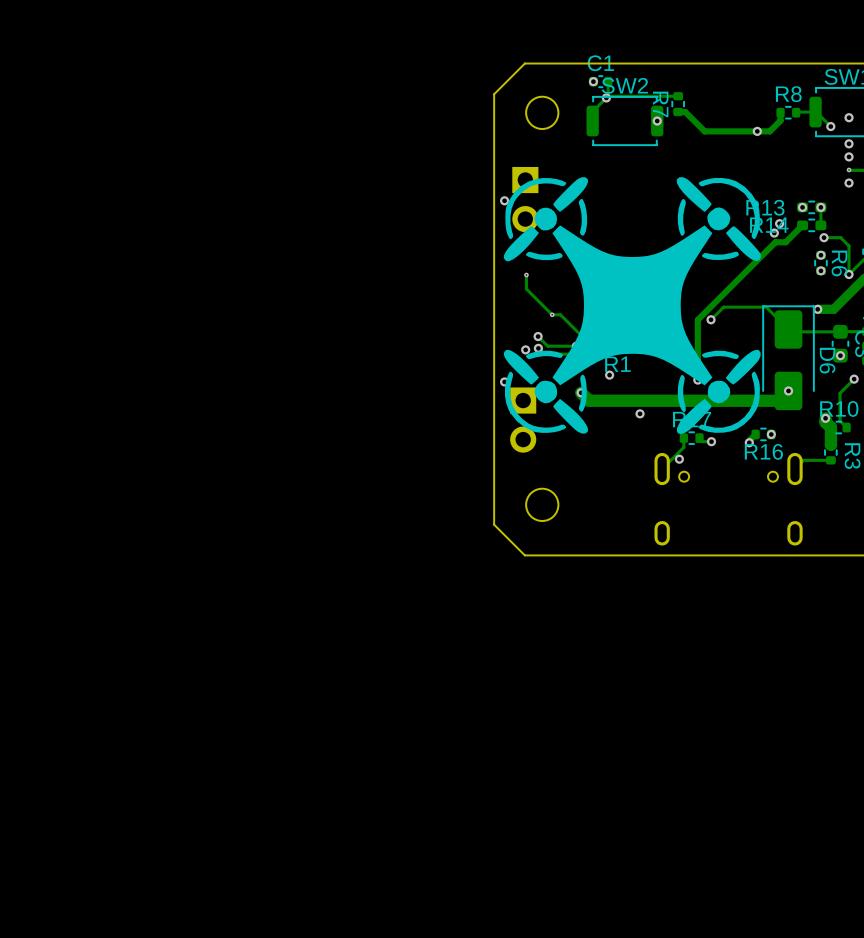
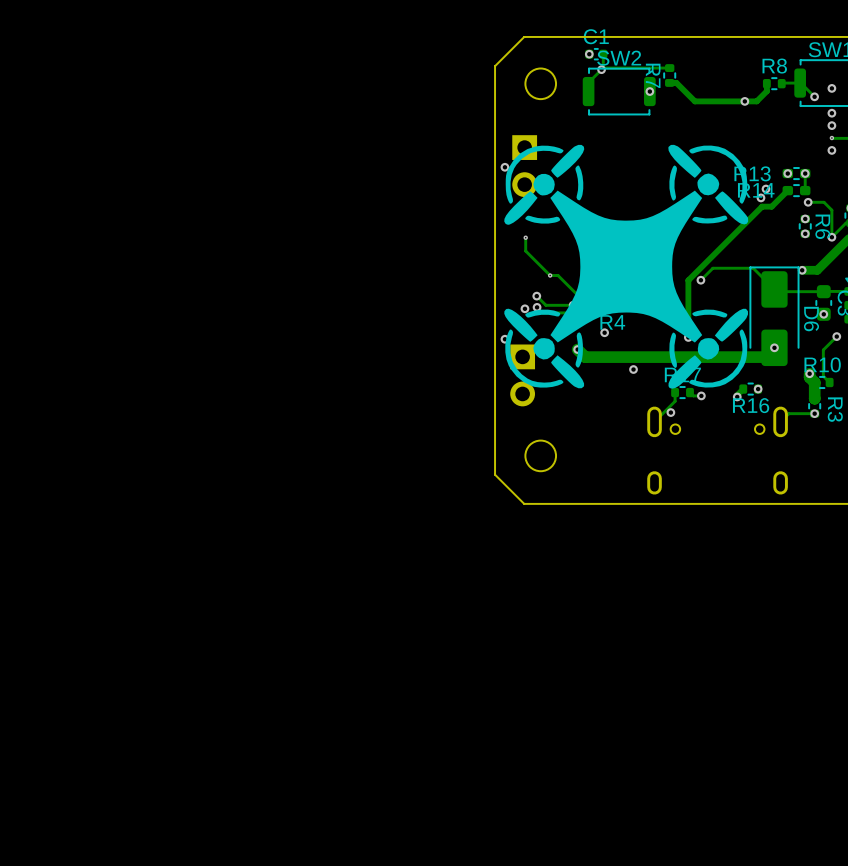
R1 name: R1 (617, 364) -> R4 (612, 322)
via: none -> (814, 413)

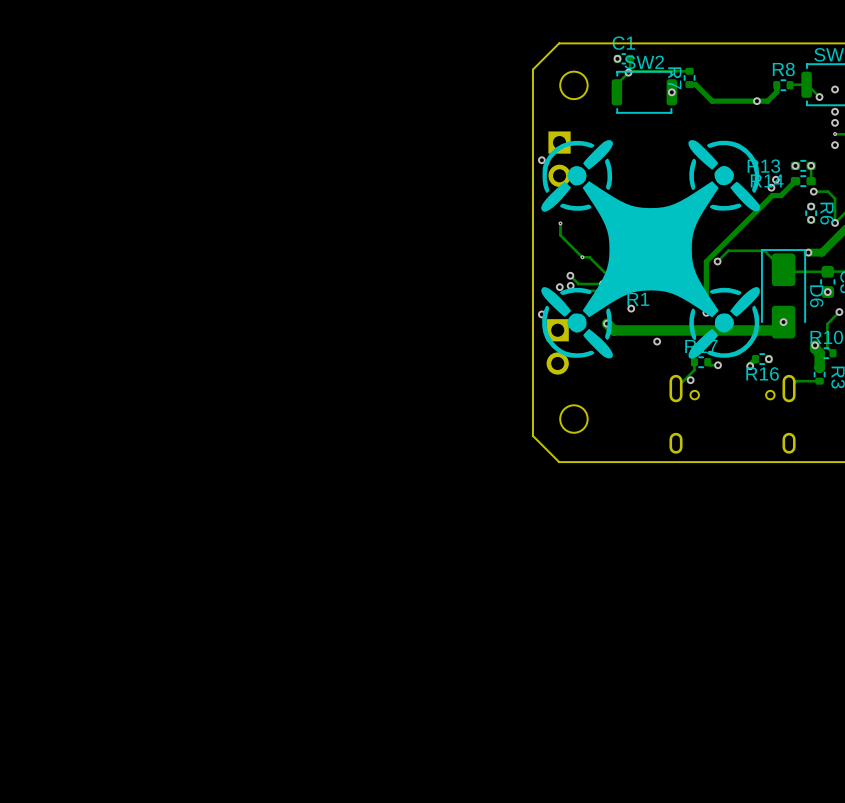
R4 name: R4 (612, 322) -> R1 (638, 299)
via: (814, 413) -> none

